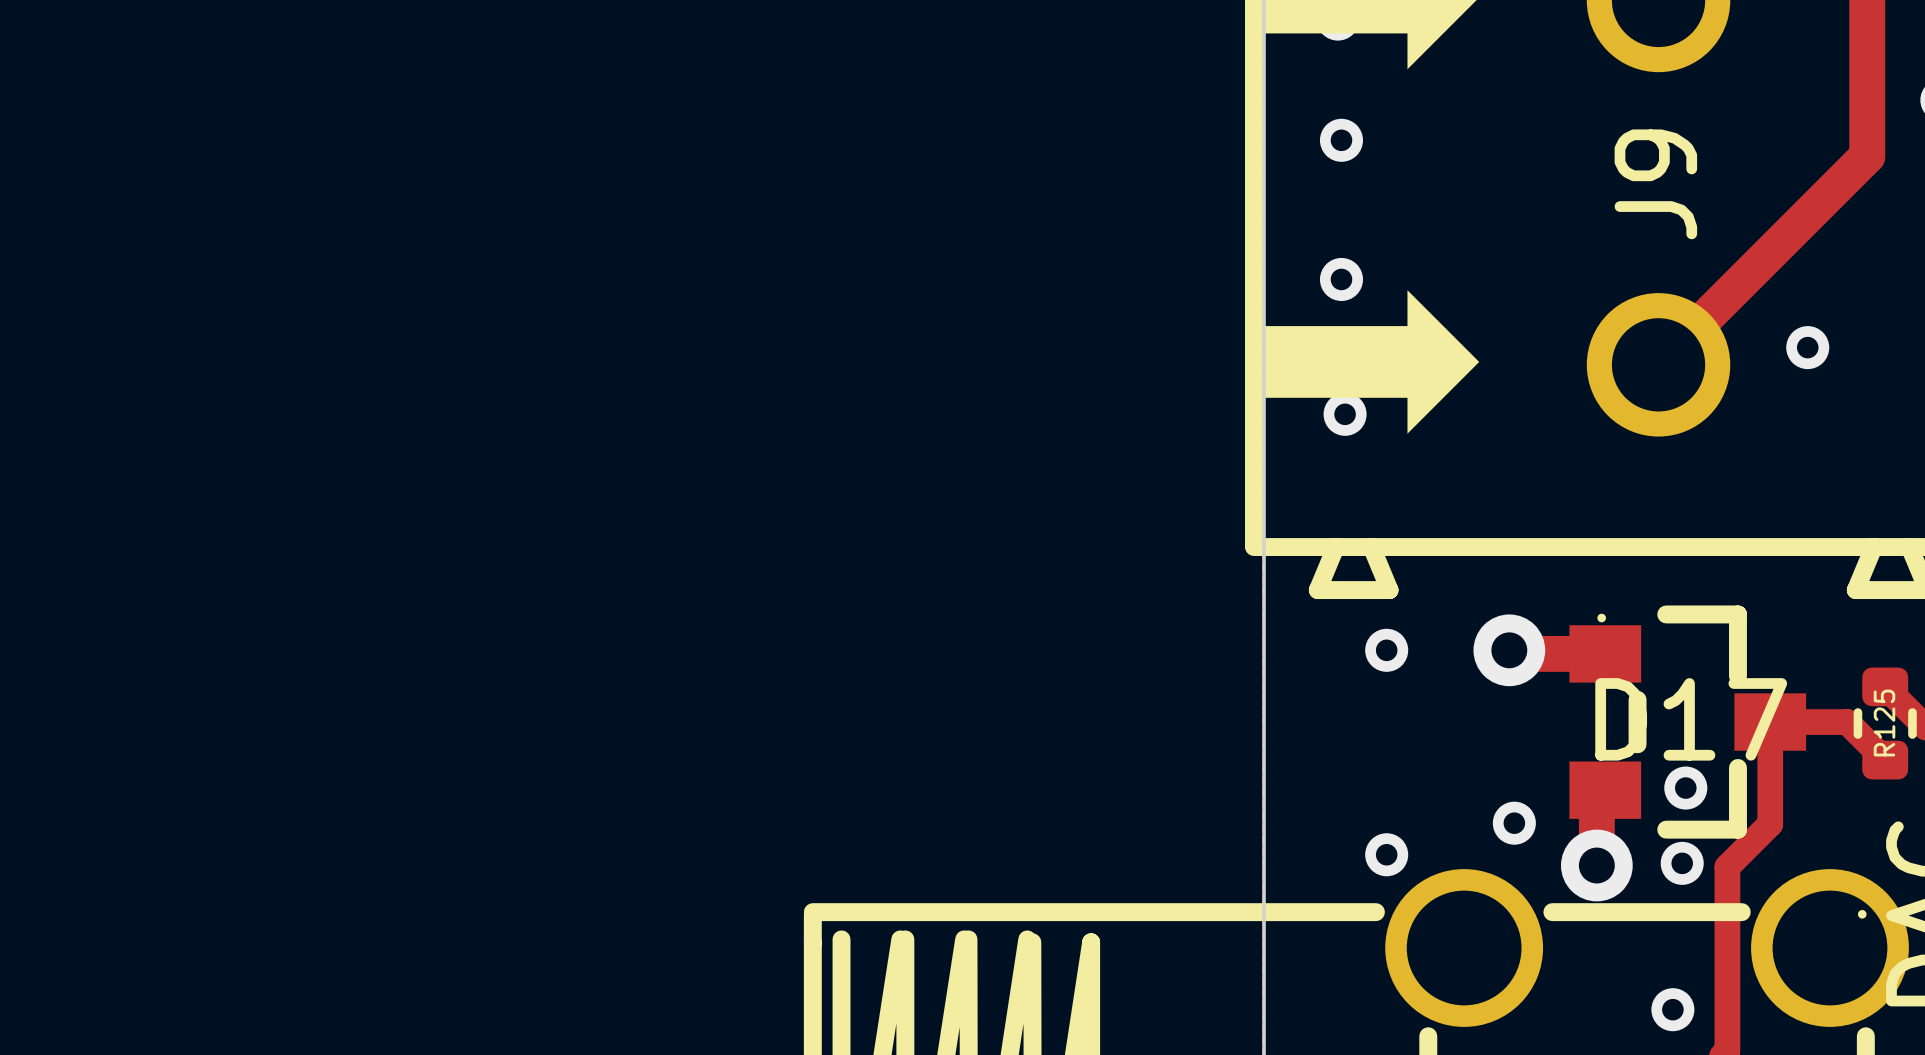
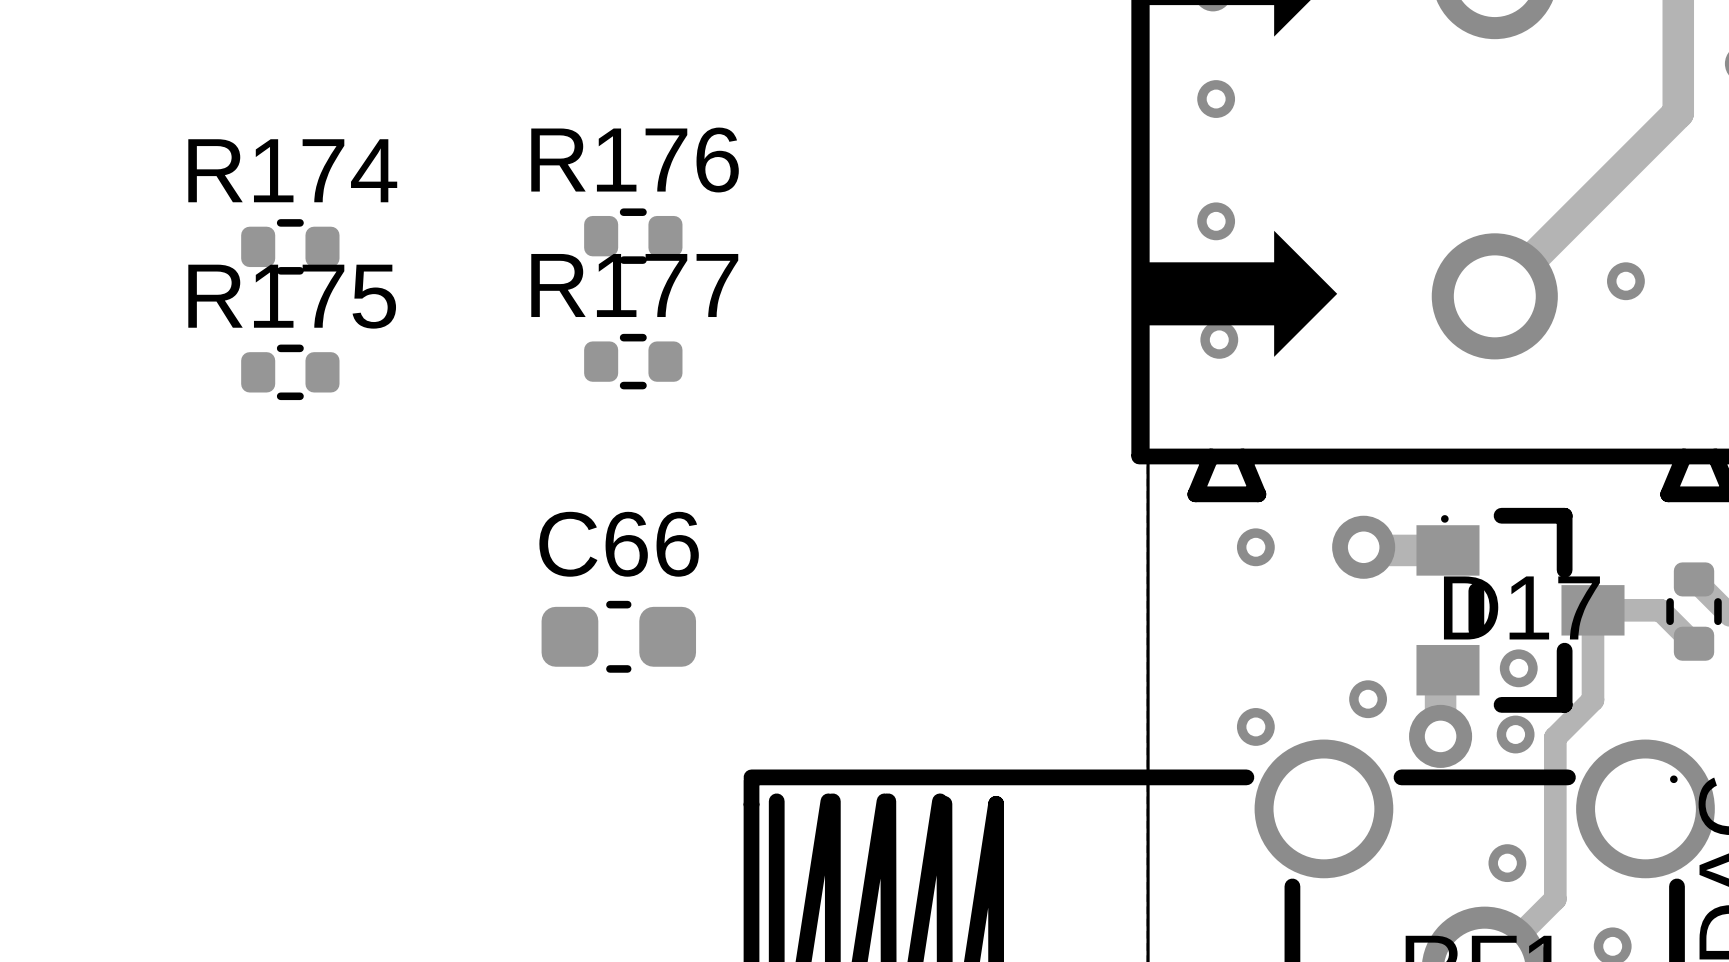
J9 name: J9 (1655, 184) -> none
R176: none -> (633, 236)
R174: none -> (290, 246)
R177: none -> (633, 361)
R175: none -> (290, 372)
R125 name: R125 (1884, 723) -> none
C66: none -> (618, 636)

